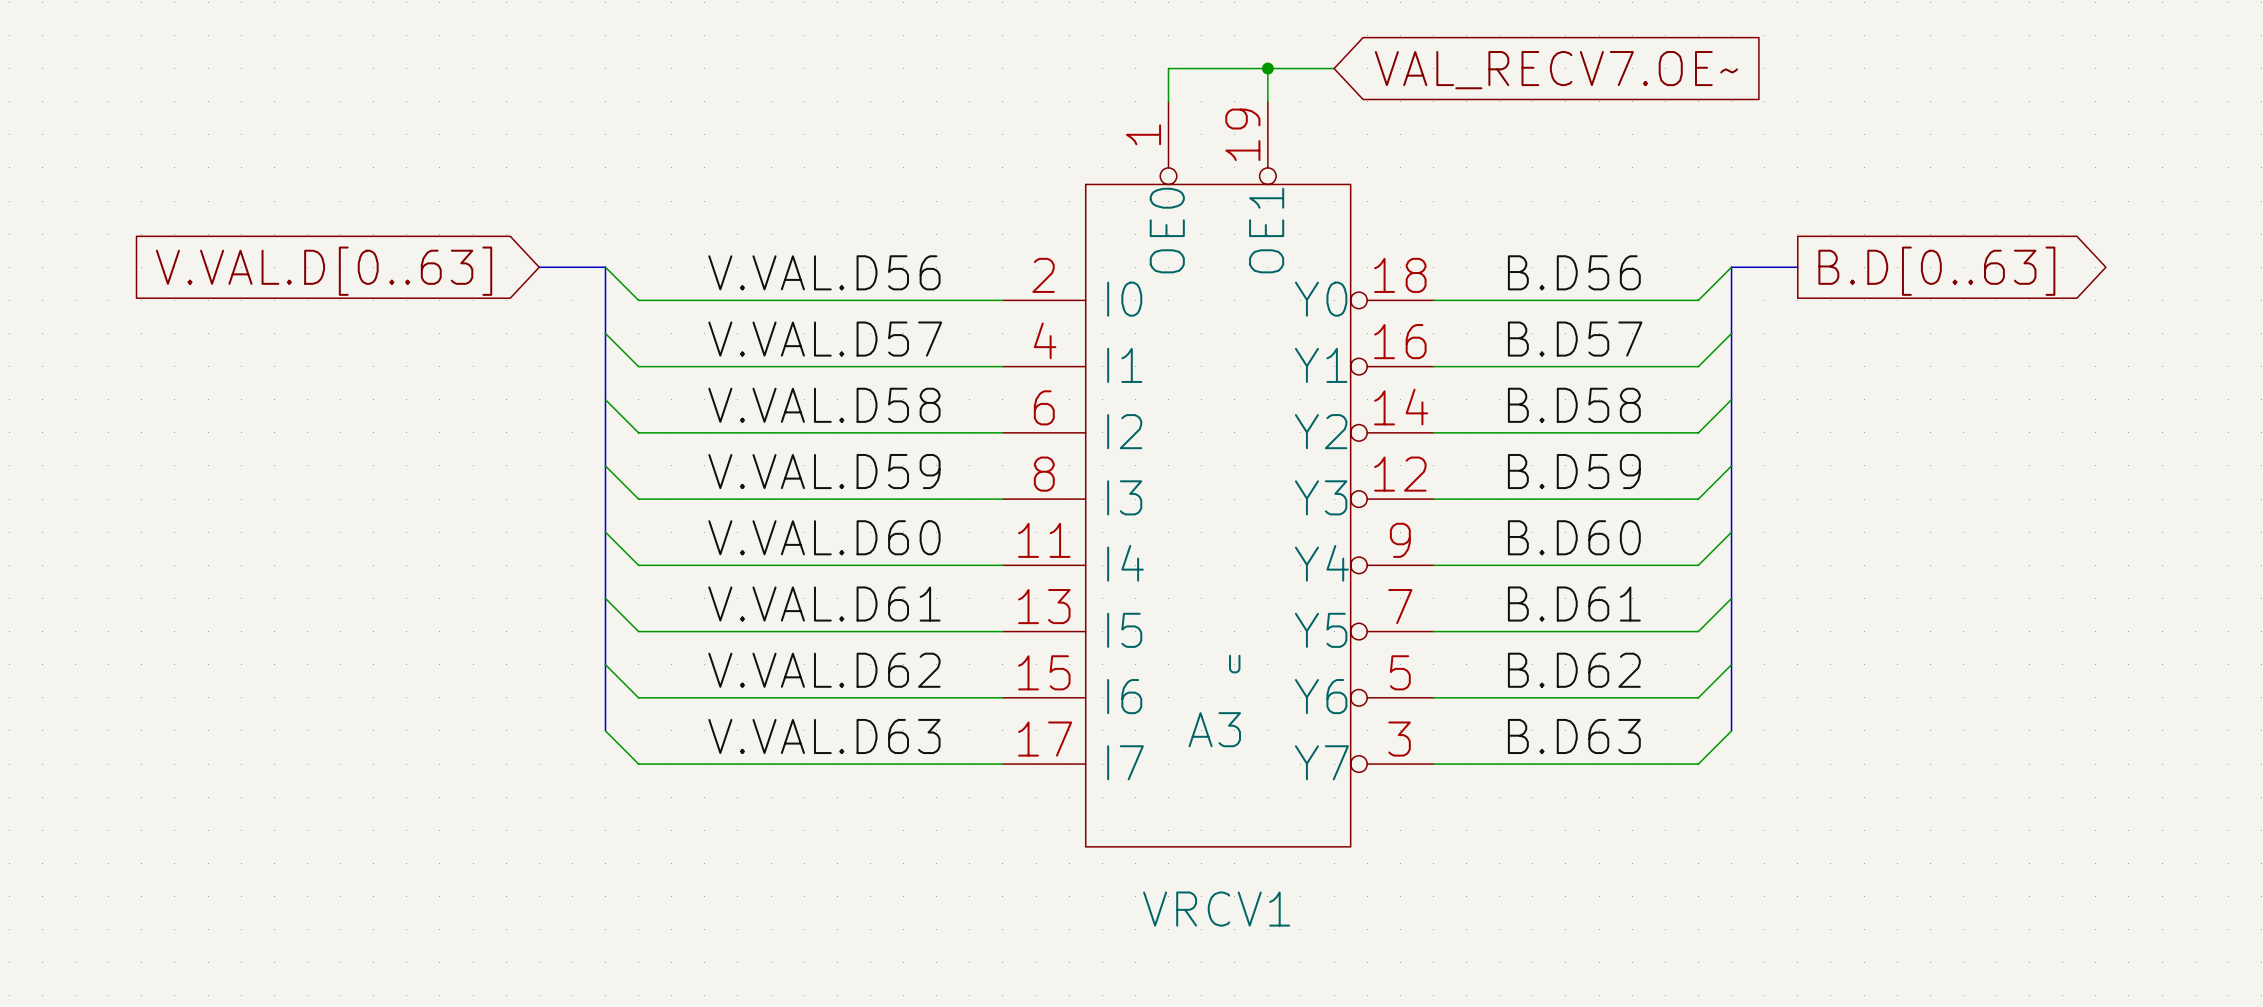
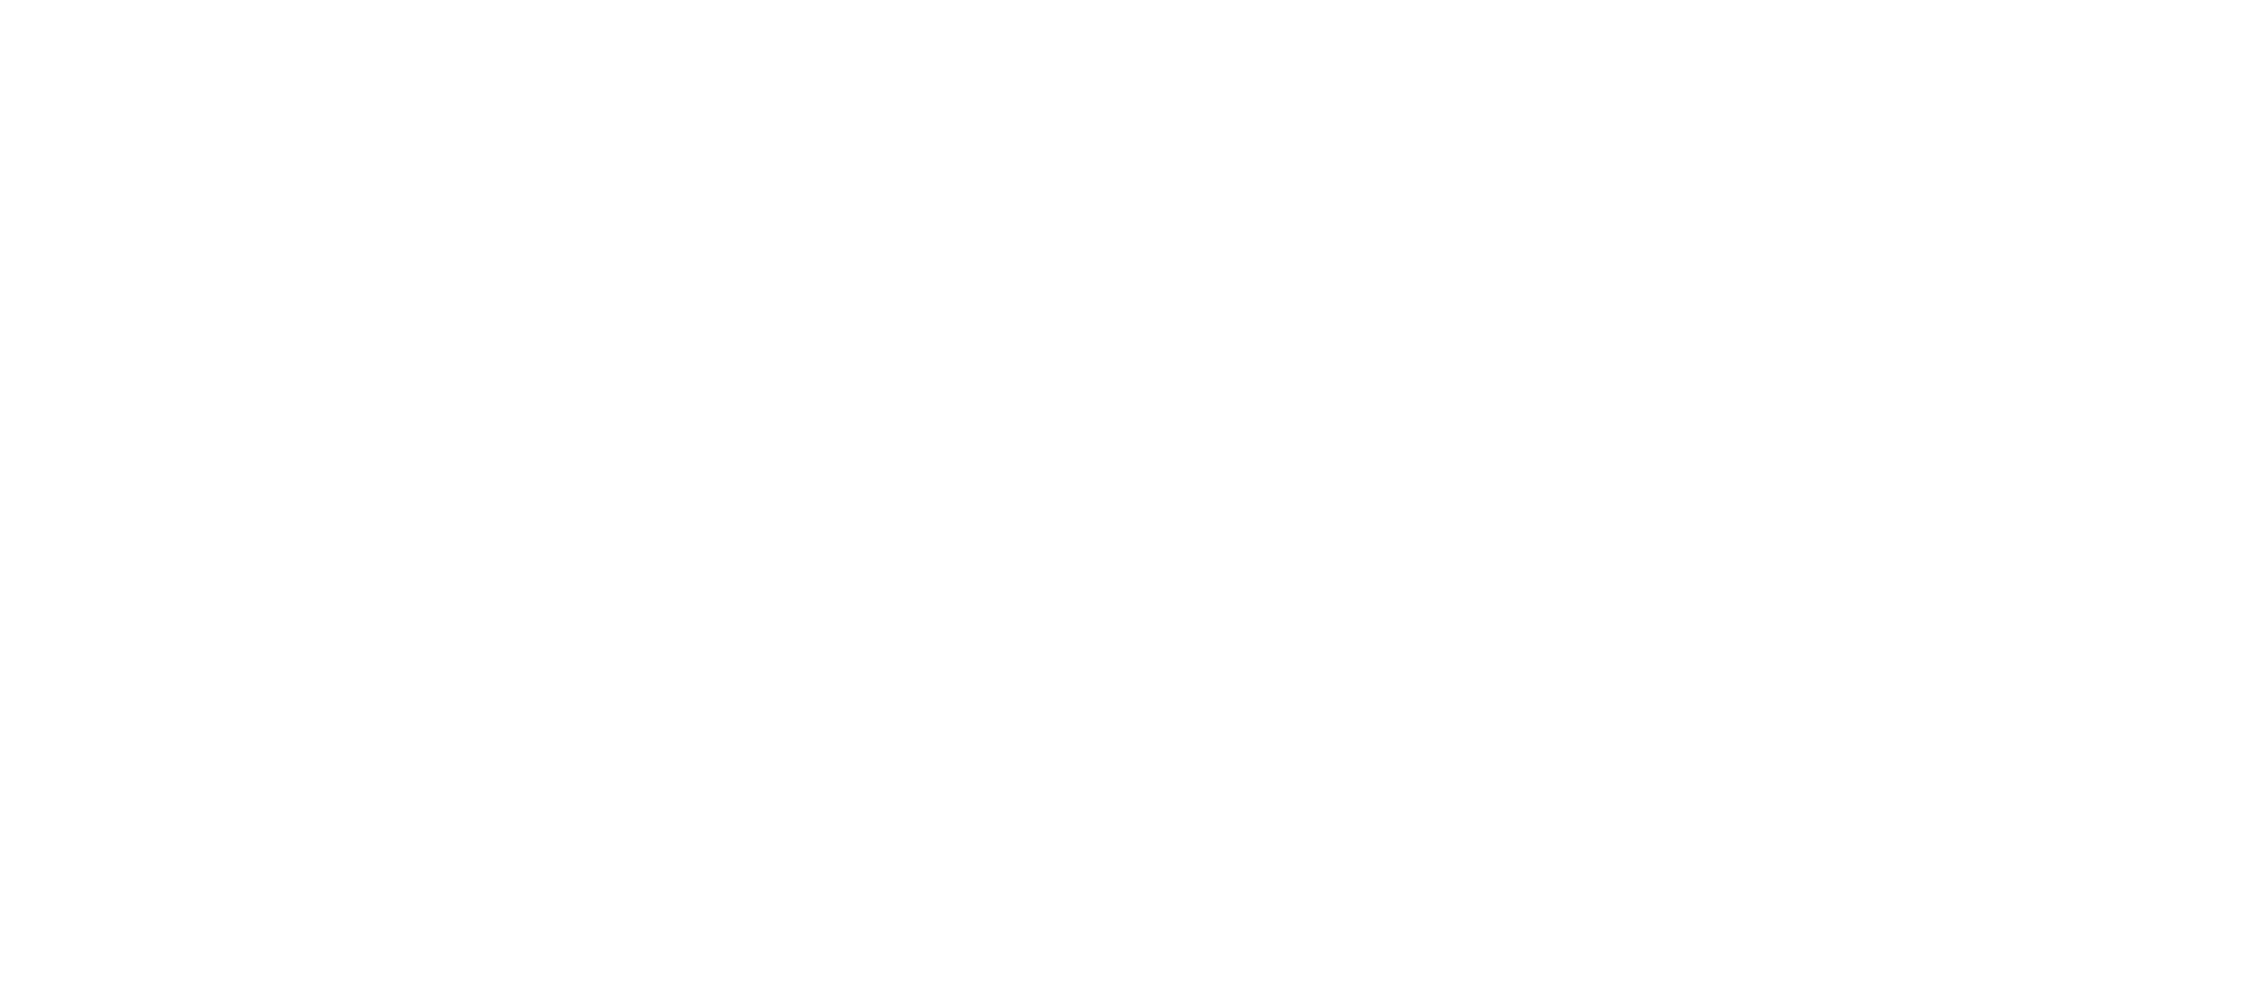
wire: (1267, 68) (1267, 101) -> none
junction: (1267, 68) -> none
wire: (1334, 68) (1168, 68) (1168, 101) -> none
global label: VAL_RECV7.OE~ (1556, 70) -> none
bus: (539, 267) (605, 267) (605, 730) -> none
wire: (605, 267) (638, 300) (1002, 300) -> none
wire: (1731, 267) (1698, 300) (1433, 300) -> none
bus: (1797, 267) (1731, 267) (1731, 730) -> none
global label: V.VAL.D[0..63] (324, 271) -> none
global label: B.D[0..63] (1936, 271) -> none
label: V.VAL.D56 (824, 272) -> none
label: B.D56 (1574, 272) -> none
wire: (605, 333) (638, 366) (1002, 366) -> none
wire: (1731, 333) (1698, 366) (1433, 366) -> none
label: V.VAL.D57 (825, 339) -> none
label: B.D57 (1575, 339) -> none
wire: (605, 399) (638, 432) (1002, 432) -> none
wire: (1731, 399) (1698, 432) (1433, 432) -> none
label: V.VAL.D58 (824, 405) -> none
label: B.D58 (1574, 405) -> none
wire: (605, 465) (638, 499) (1002, 499) -> none
wire: (1731, 465) (1698, 499) (1433, 499) -> none
label: V.VAL.D59 (824, 471) -> none
label: B.D59 (1574, 471) -> none
U: (1218, 474) -> none
wire: (605, 532) (638, 565) (1002, 565) -> none
wire: (1731, 532) (1698, 565) (1433, 565) -> none
label: V.VAL.D60 (824, 537) -> none
label: B.D60 (1574, 537) -> none
wire: (605, 598) (638, 631) (1002, 631) -> none
wire: (1731, 598) (1698, 631) (1433, 631) -> none
label: V.VAL.D61 (824, 604) -> none
label: B.D61 (1574, 604) -> none
wire: (605, 664) (638, 697) (1002, 697) -> none
wire: (1731, 664) (1698, 697) (1433, 697) -> none
label: V.VAL.D62 (824, 670) -> none
label: B.D62 (1574, 670) -> none
wire: (605, 730) (638, 764) (1002, 764) -> none
wire: (1731, 730) (1698, 764) (1433, 764) -> none
label: V.VAL.D63 (824, 736) -> none
label: B.D63 (1574, 736) -> none

